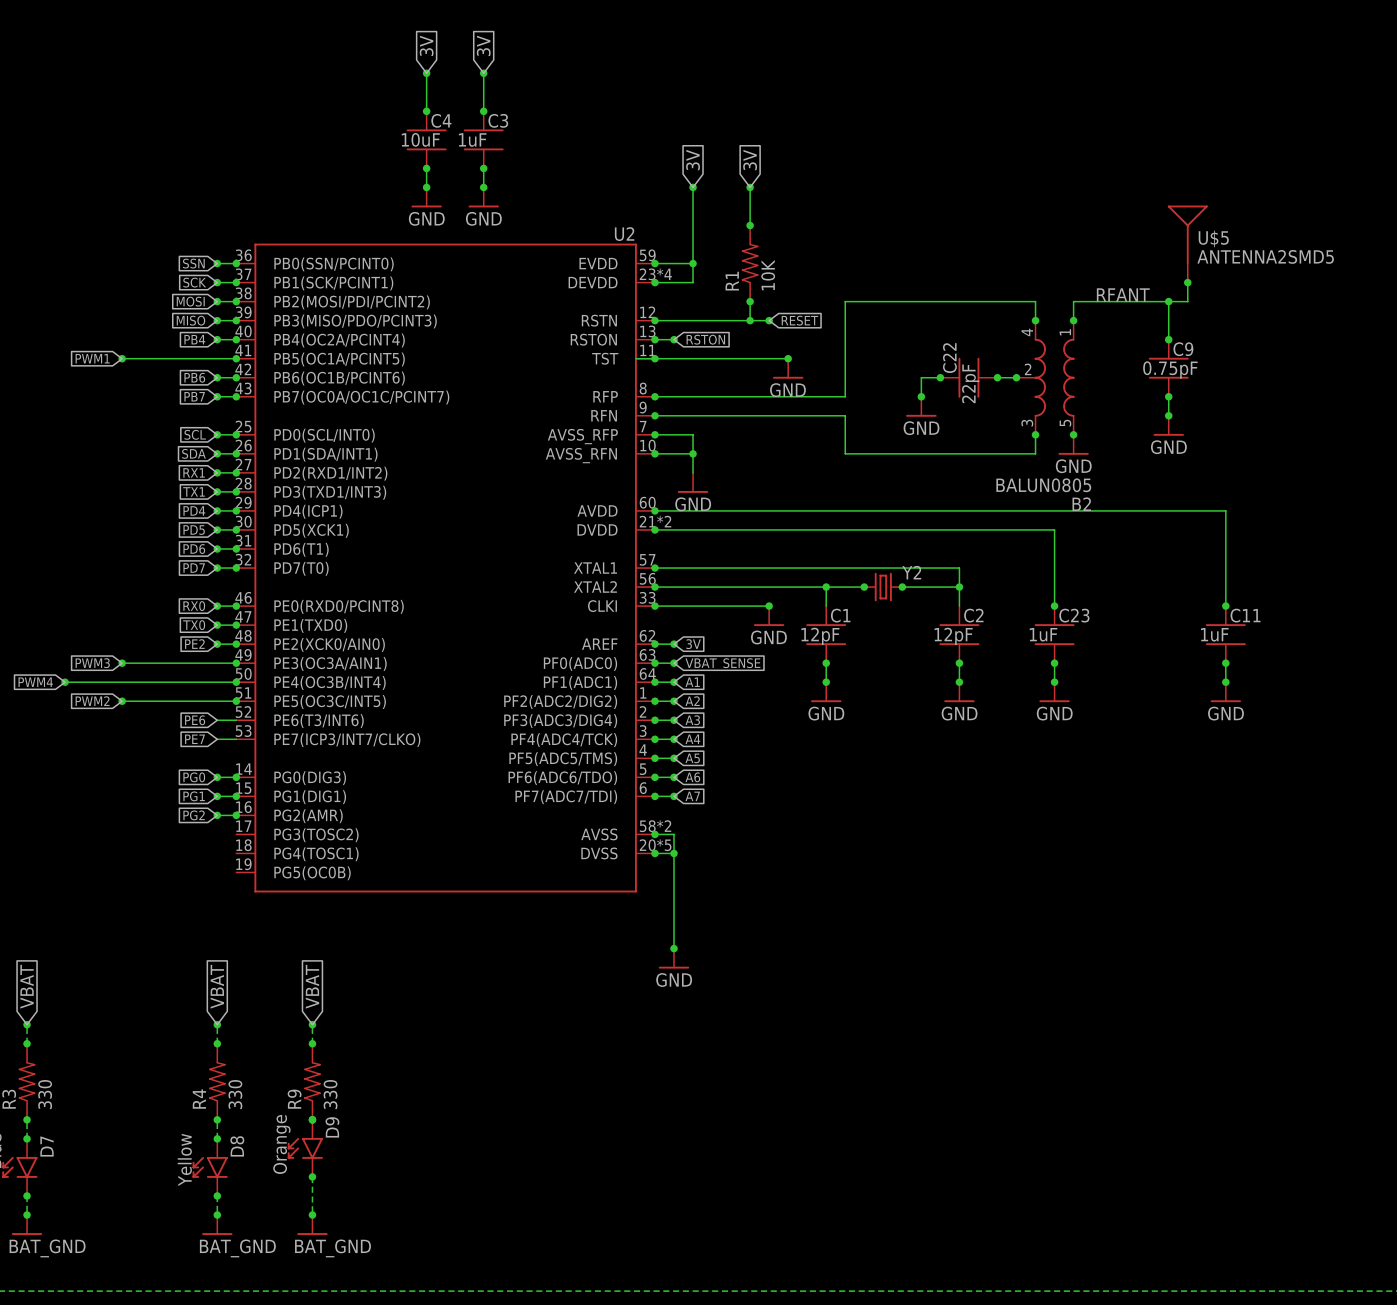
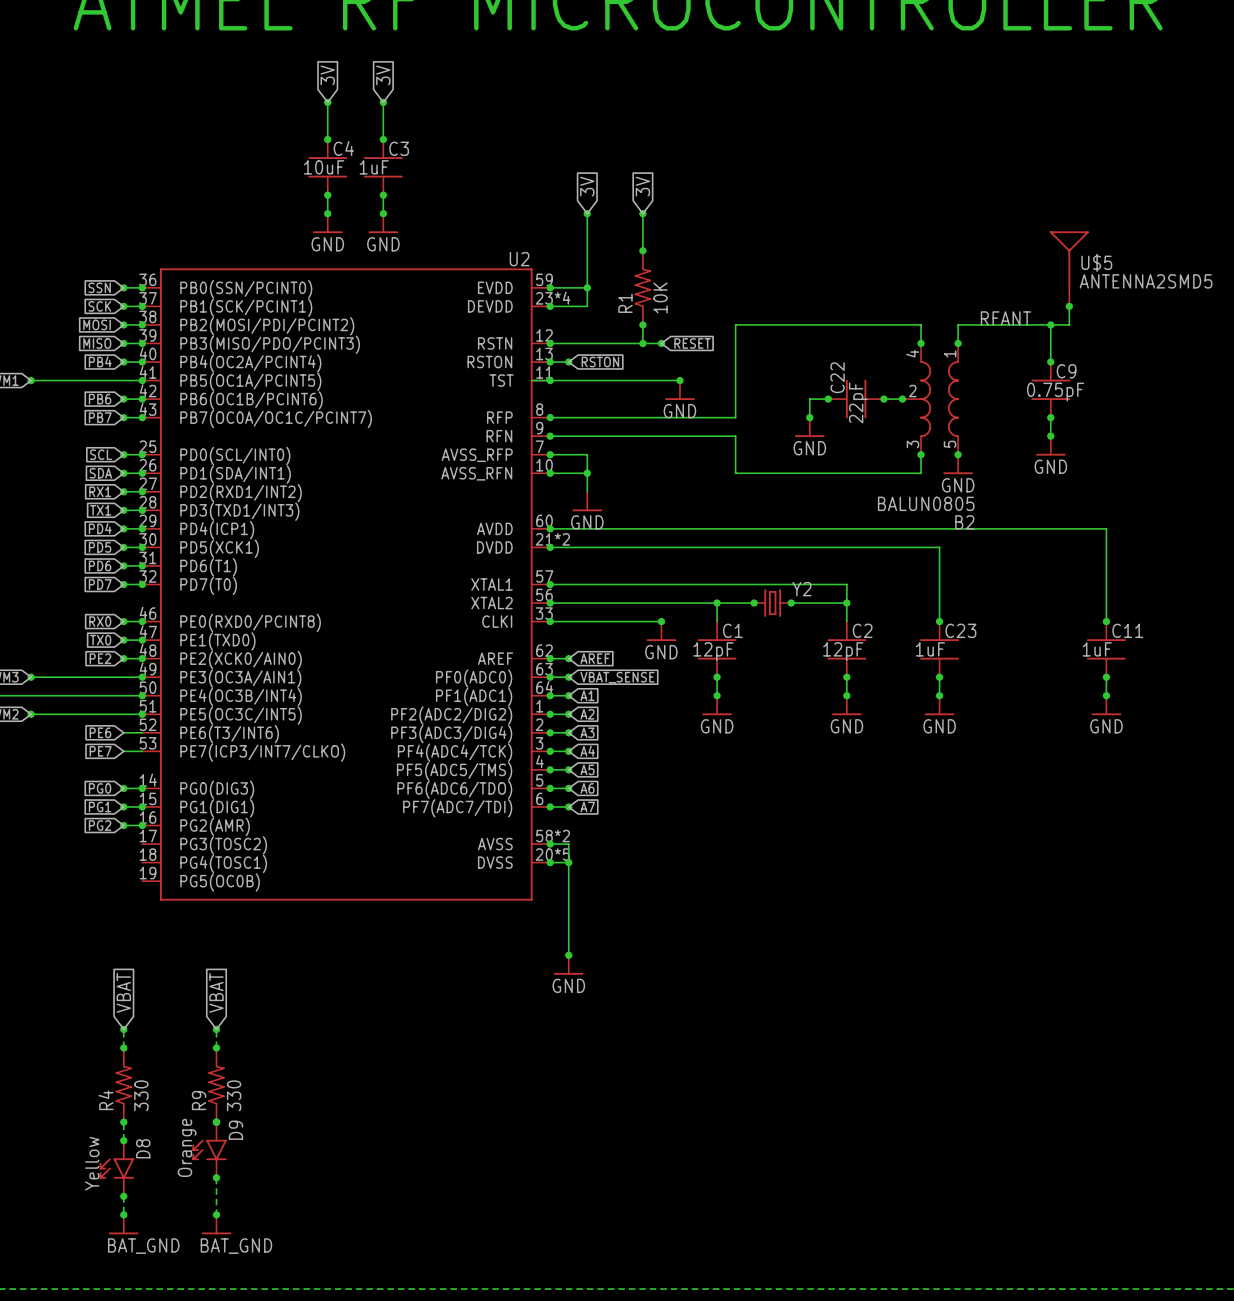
global label: 3V (693, 644) -> AREF (595, 658)

